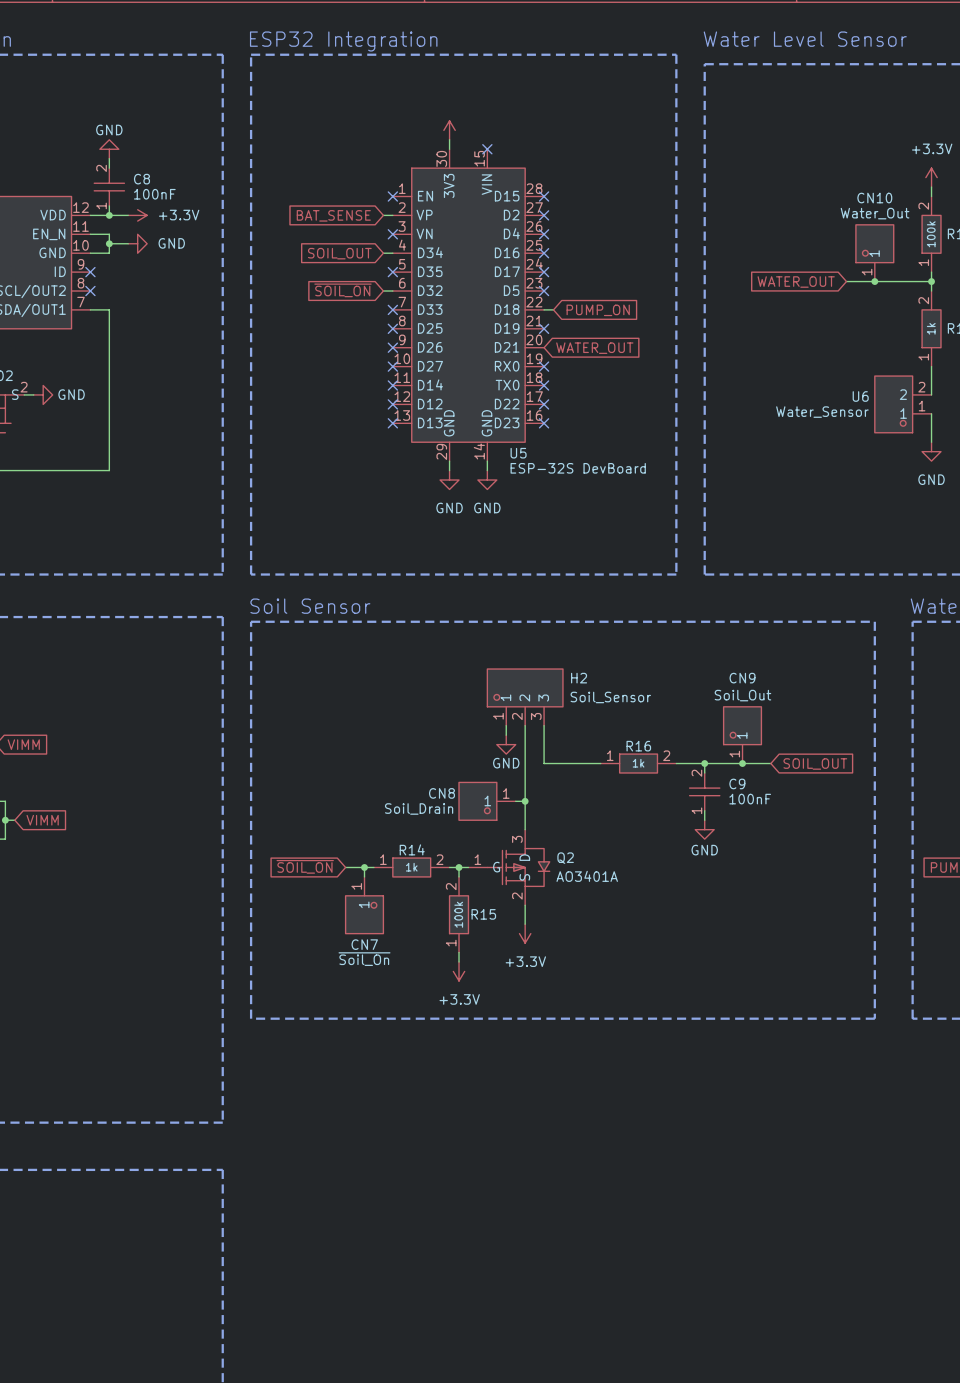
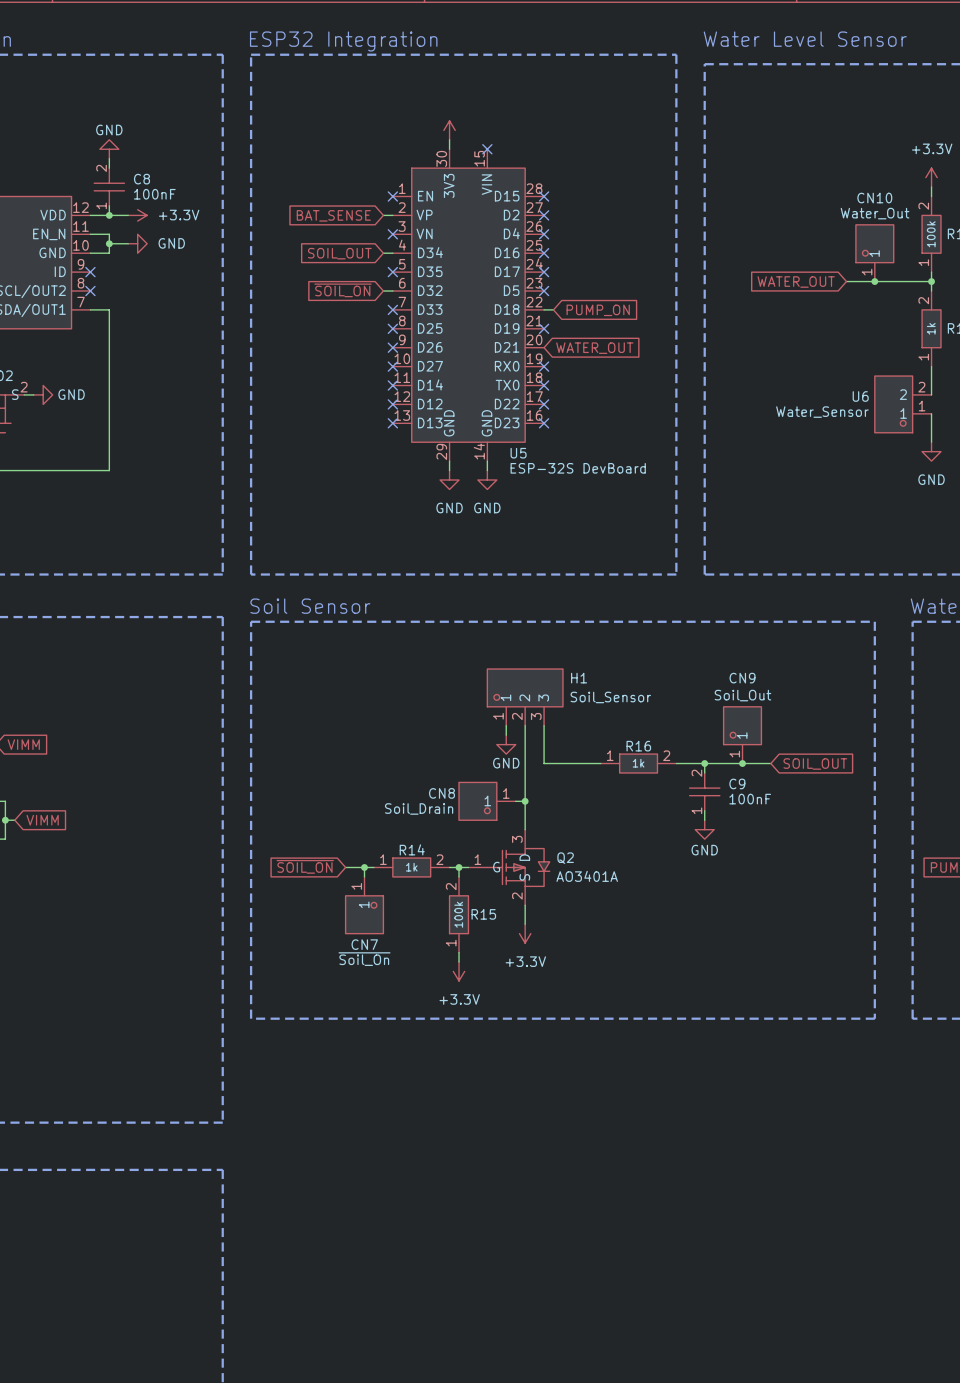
H2 name: H2 (579, 678) -> H1 (579, 678)

